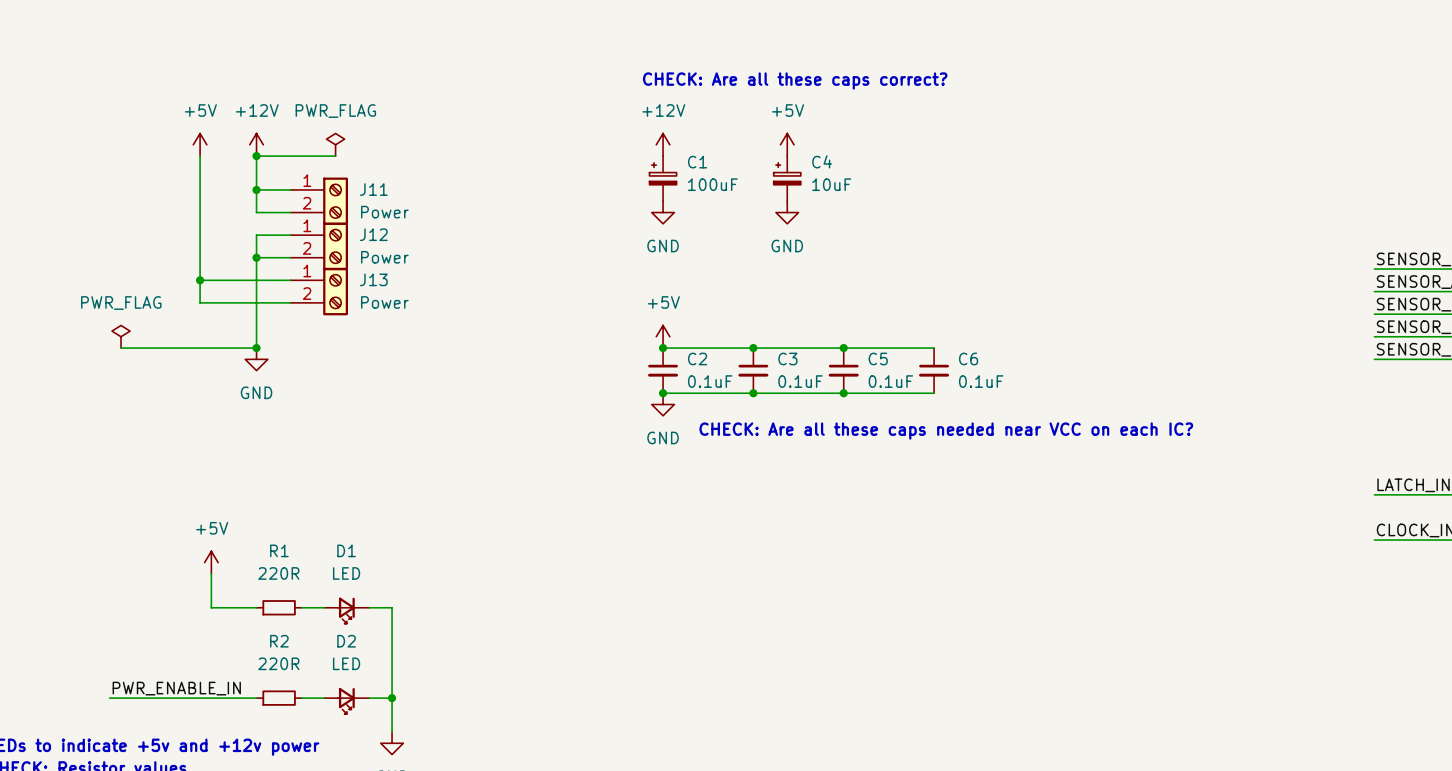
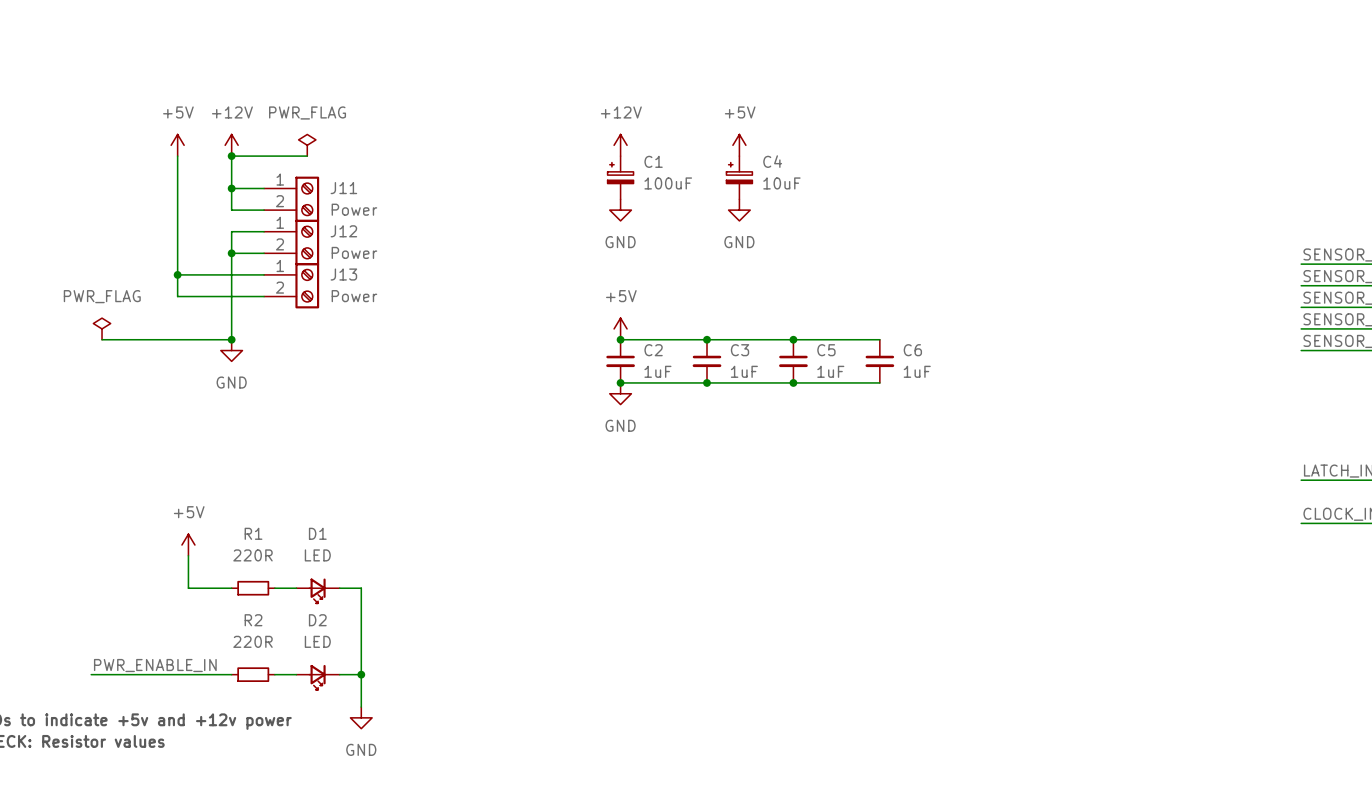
text: CHECK: Are all these caps correct? (795, 80) -> none
C2 value: 0.1uF (710, 381) -> 1uF (657, 371)
C3 value: 0.1uF (800, 381) -> 1uF (744, 371)
C5 value: 0.1uF (890, 381) -> 1uF (830, 371)
C6 value: 0.1uF (981, 381) -> 1uF (917, 371)
text: CHECK: Are all these caps needed near VCC on each IC? (946, 431) -> none

